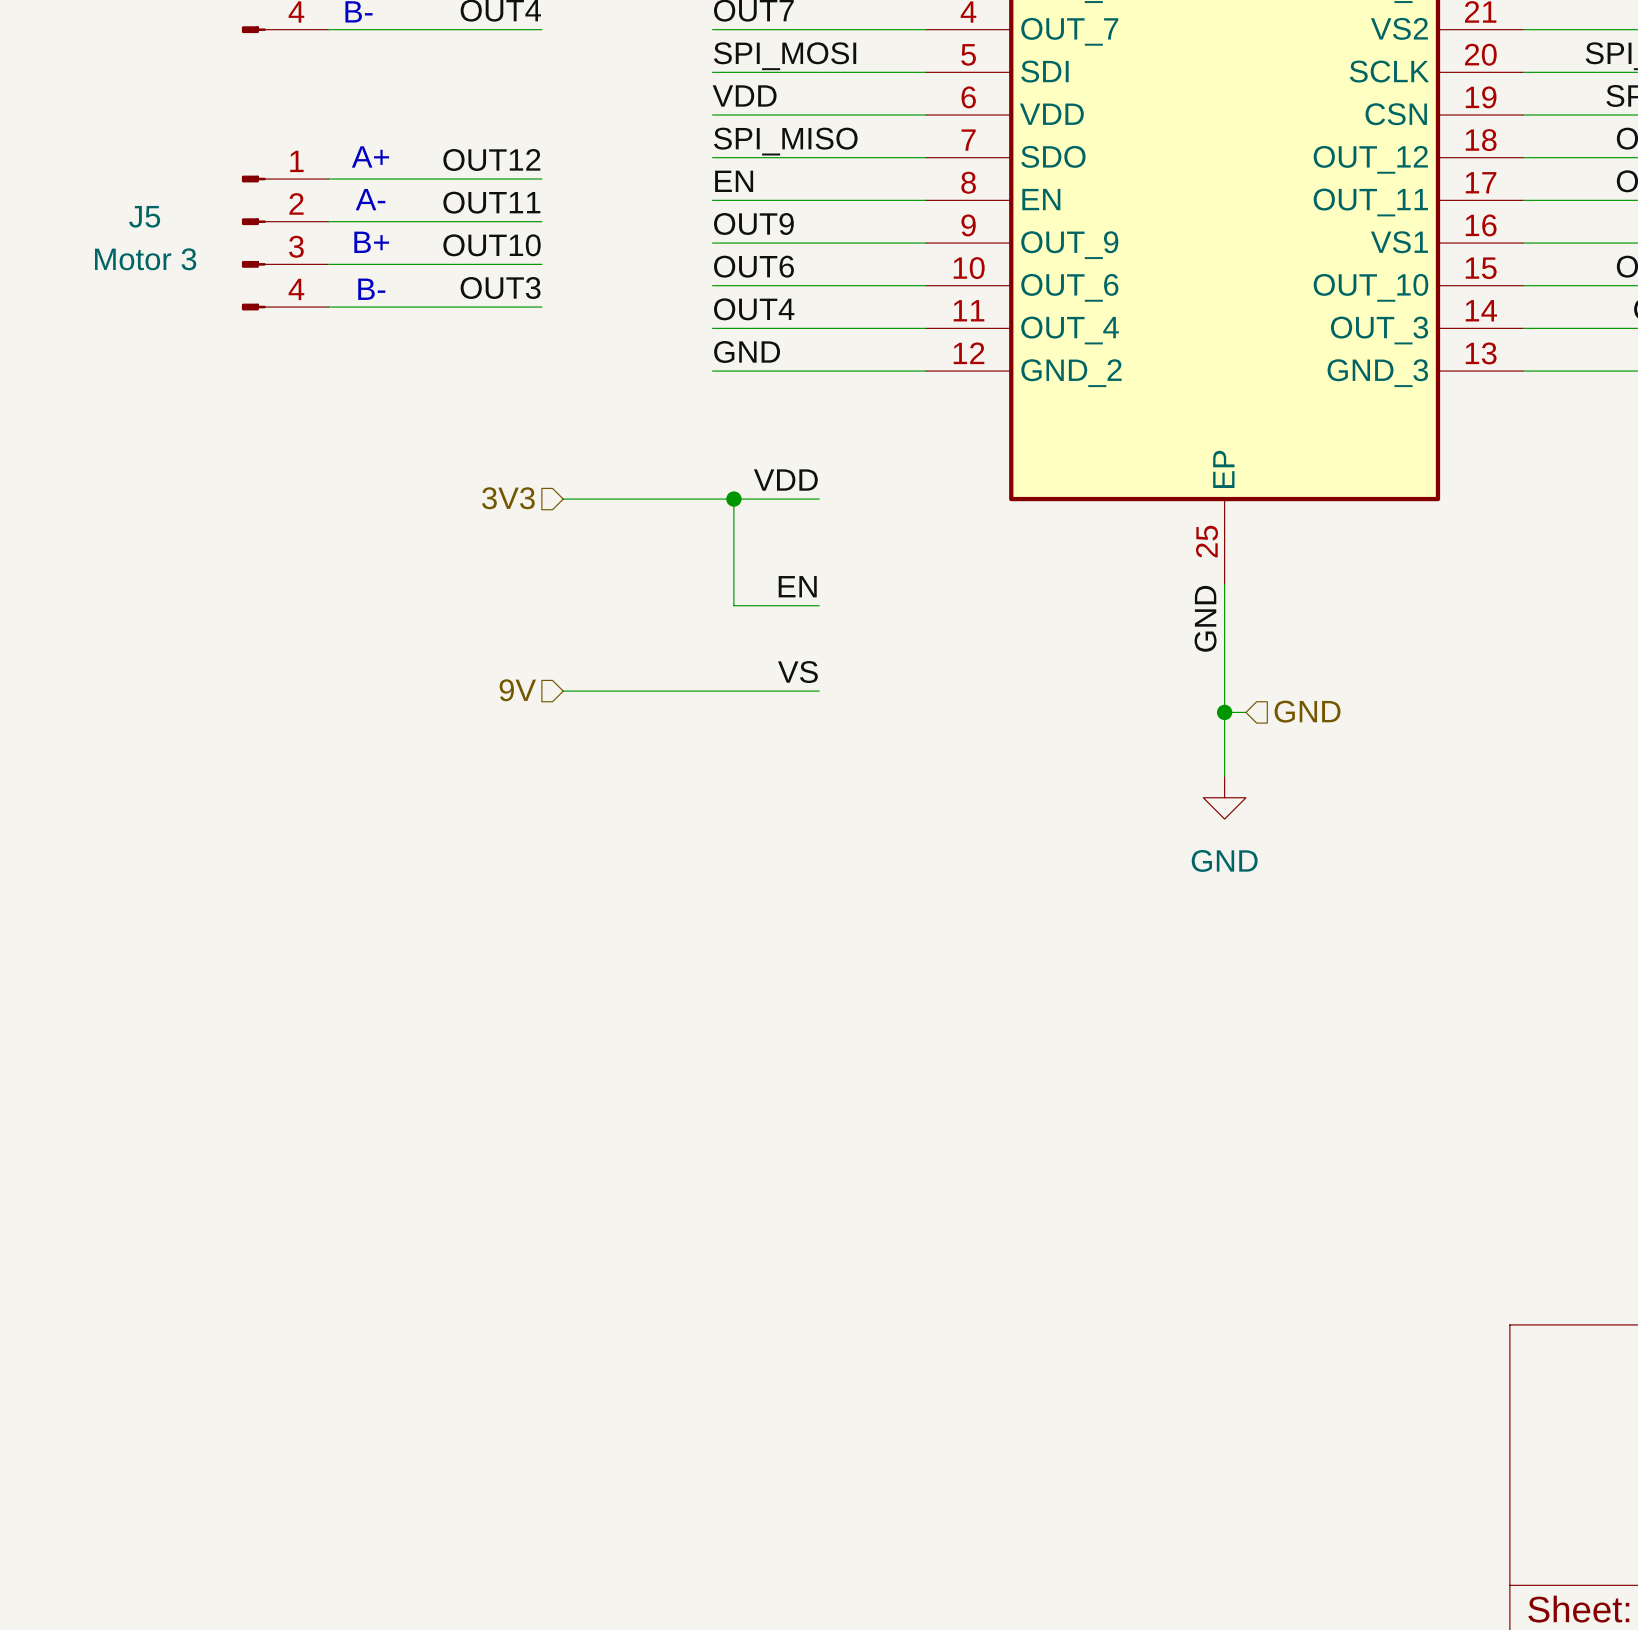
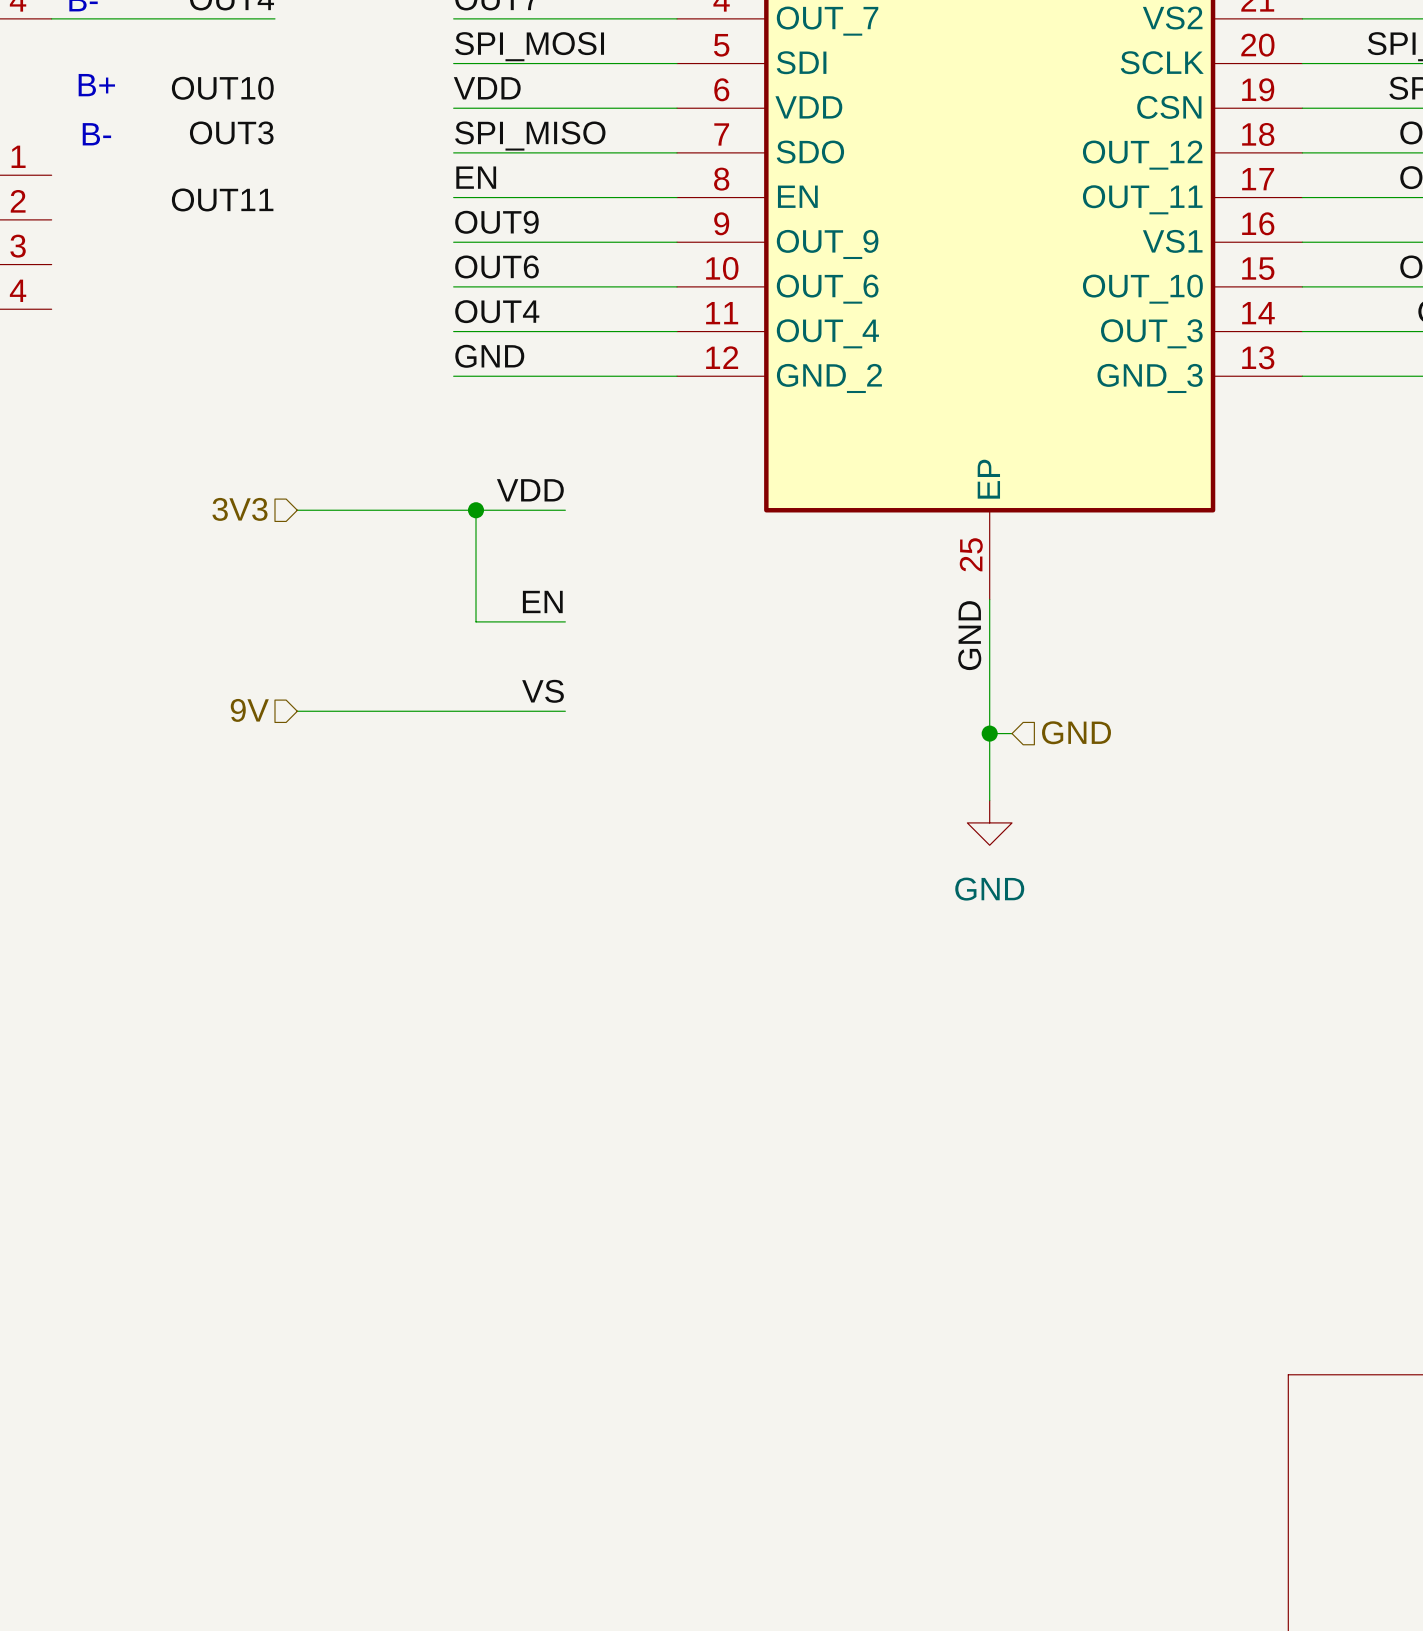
text: A+ (370, 156) -> none
label: OUT12 (491, 159) -> none
wire: (328, 179) (541, 179) -> none
text: A- (370, 199) -> none
wire: (328, 221) (541, 221) -> none
text position: B+ (371, 242) -> B+ (96, 85)
label position: OUT10 (492, 245) -> OUT10 (222, 88)
wire: (328, 264) (541, 264) -> none
label position: OUT3 (500, 287) -> OUT3 (231, 132)
text position: B- (371, 289) -> B- (96, 134)
wire: (328, 307) (541, 307) -> none

